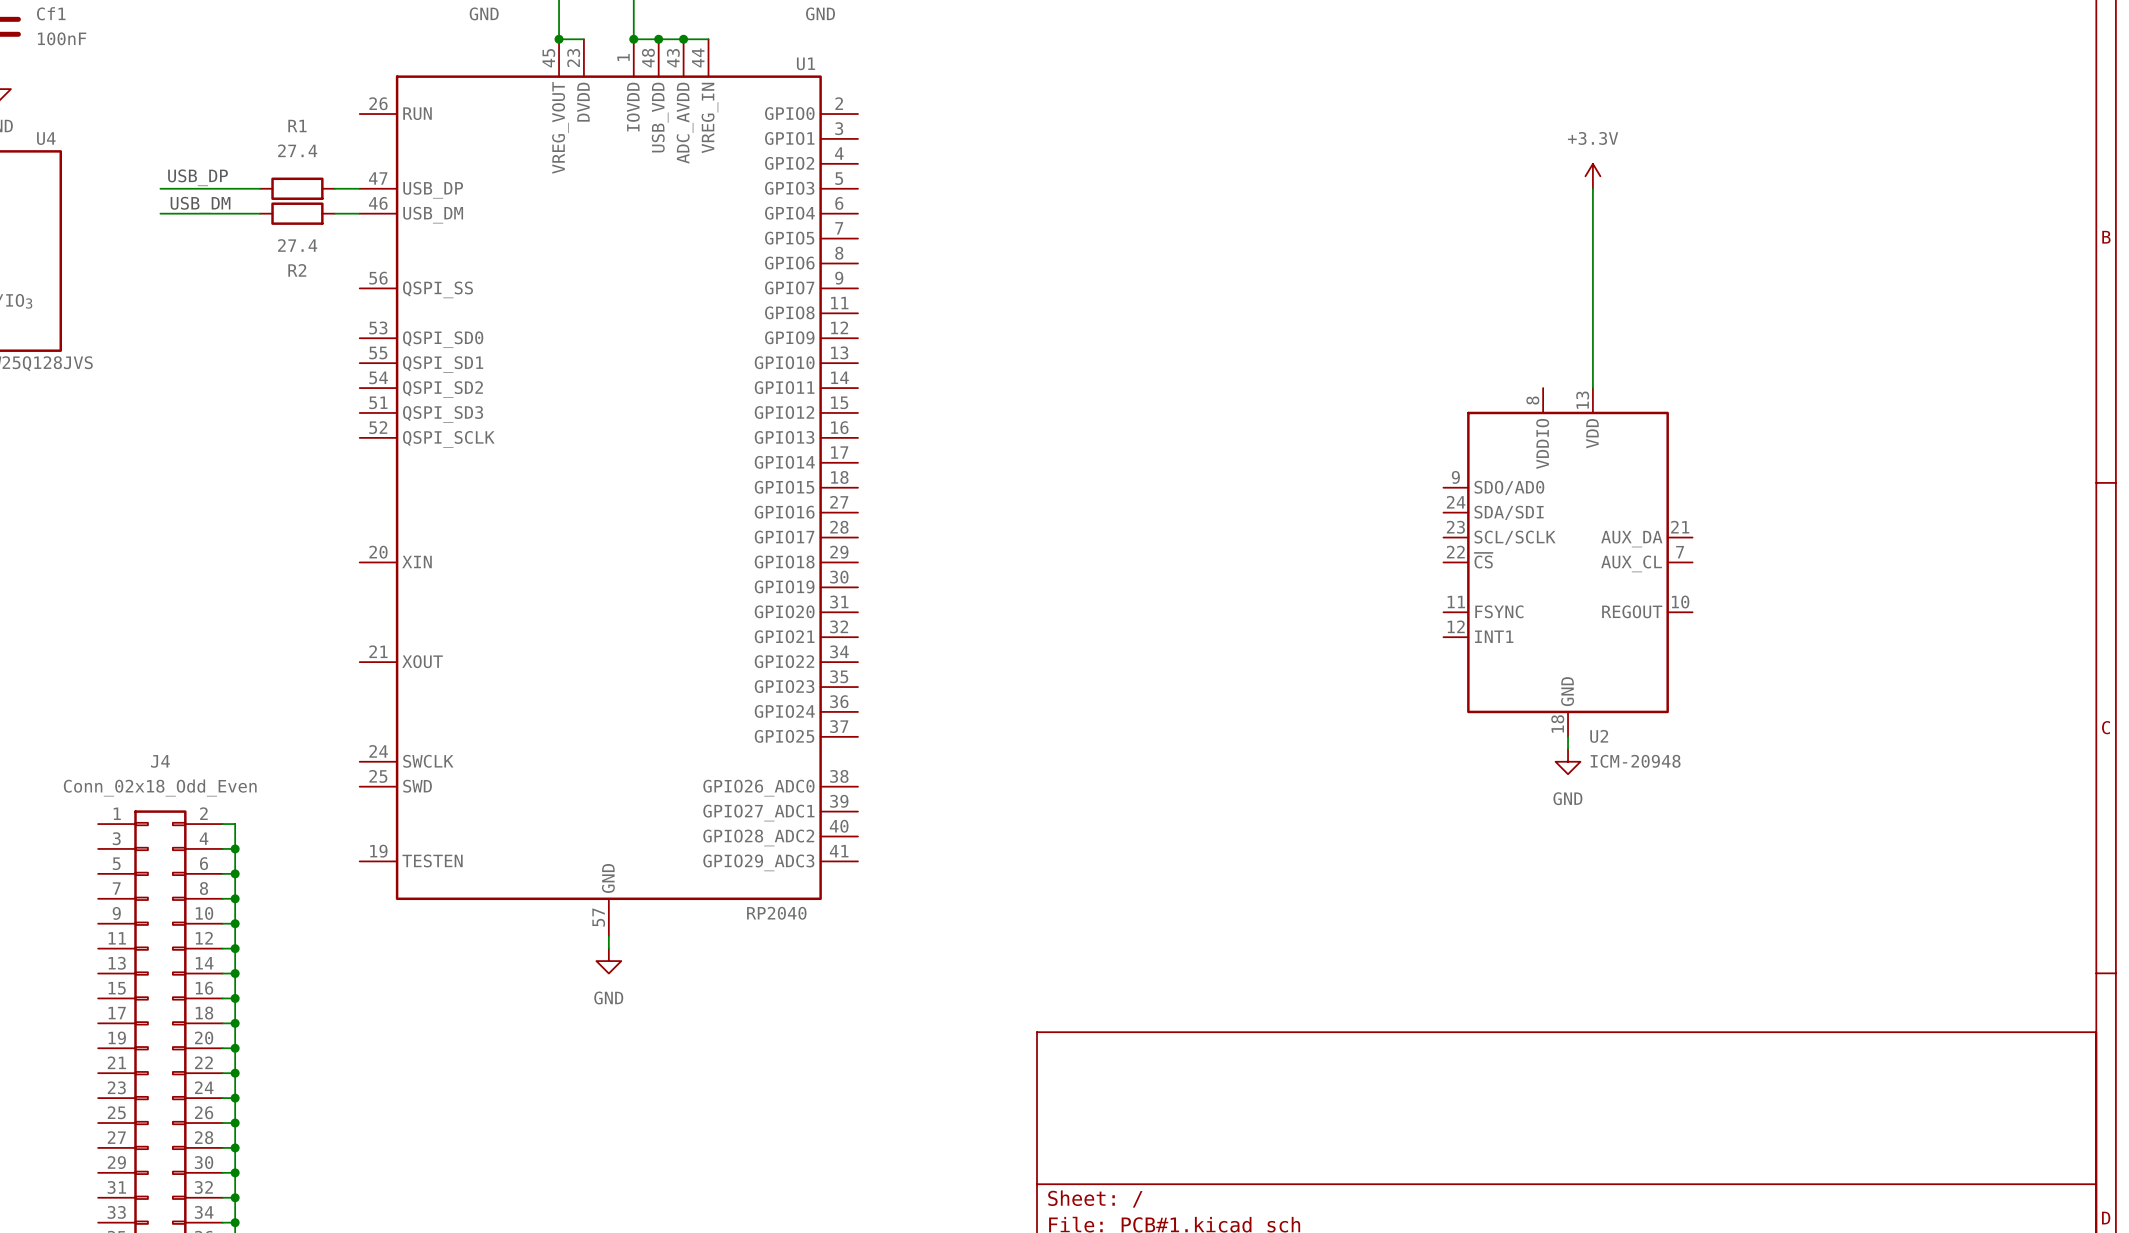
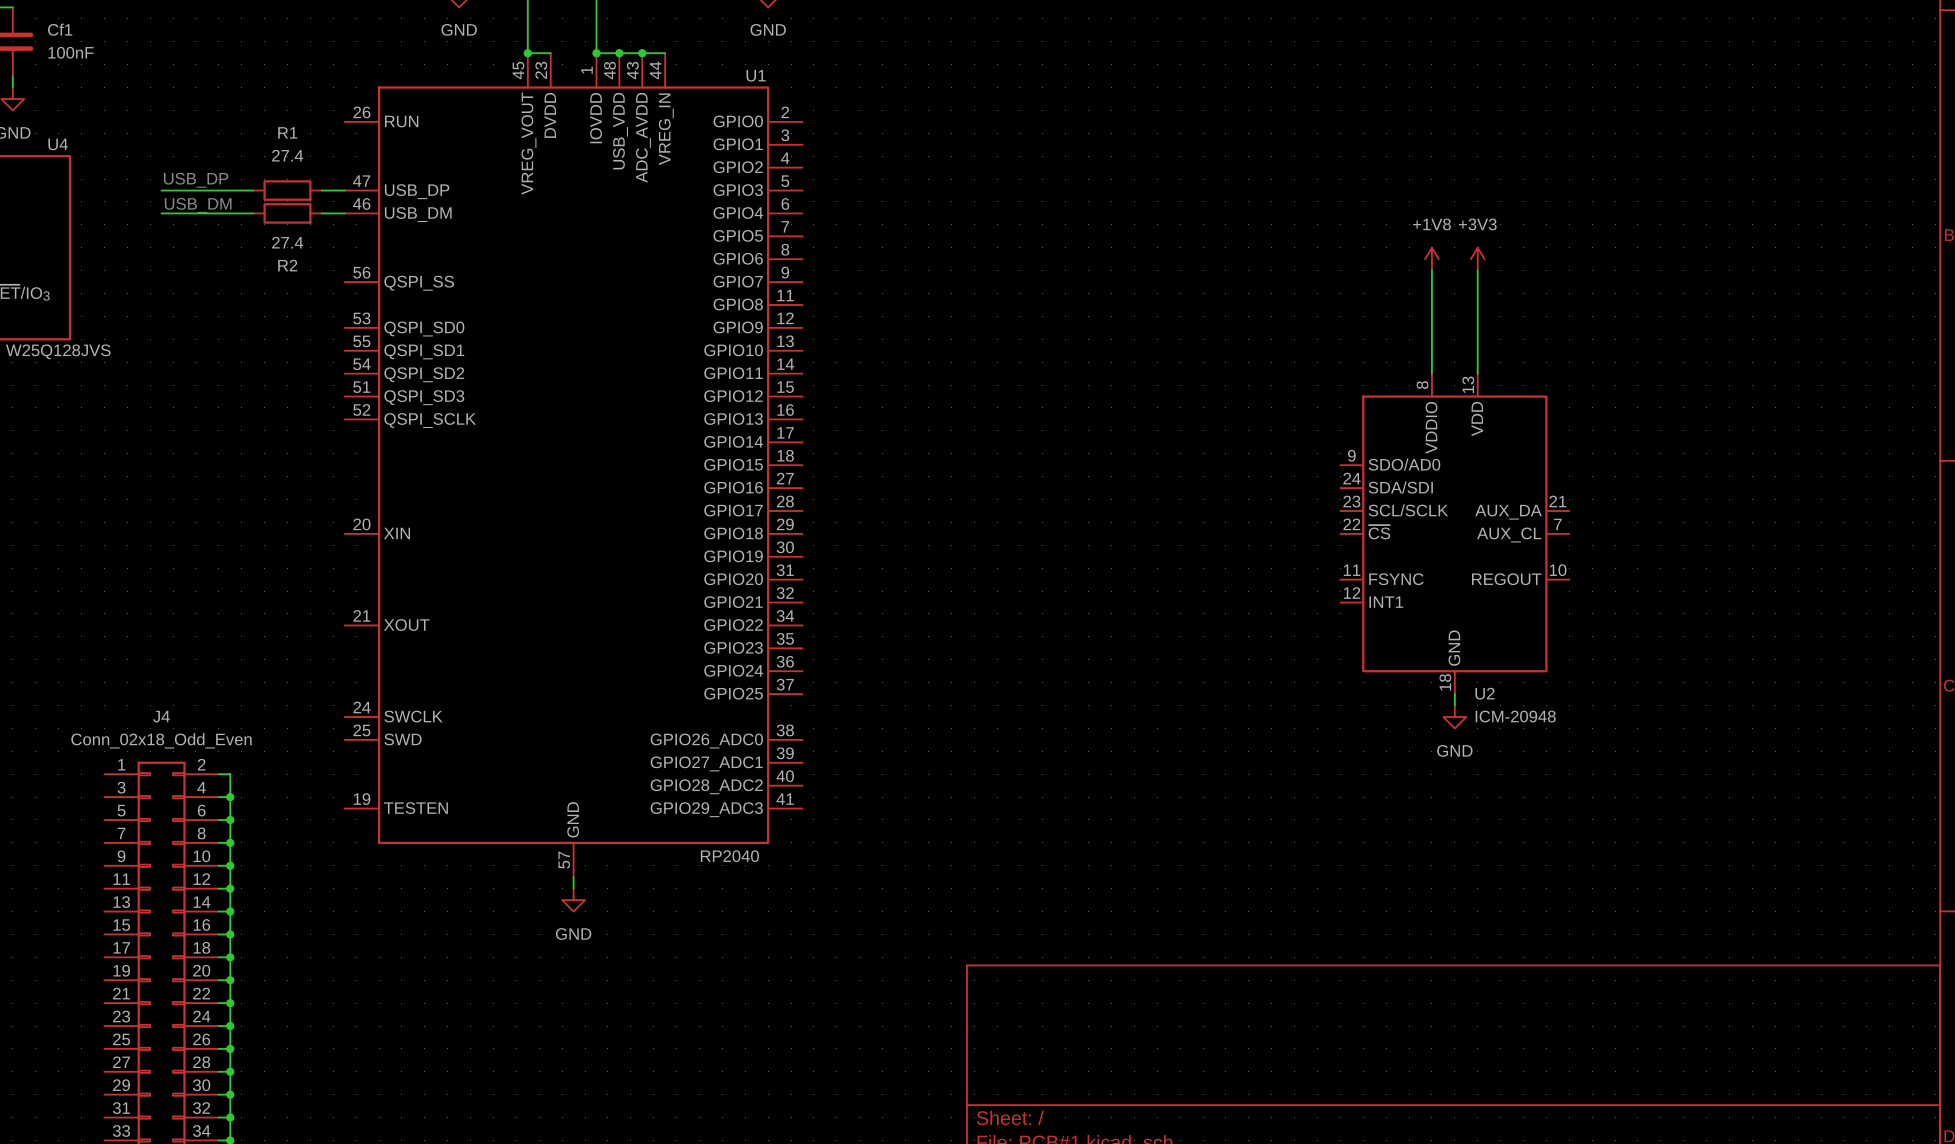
power symbol: +3.3V (1592, 176) -> none
wire: (1592, 188) (1592, 275) -> none
power symbol: none -> +1V8 (1431, 259)
power symbol: none -> +3V3 (1477, 259)
wire: none -> (1431, 270) (1431, 373)

